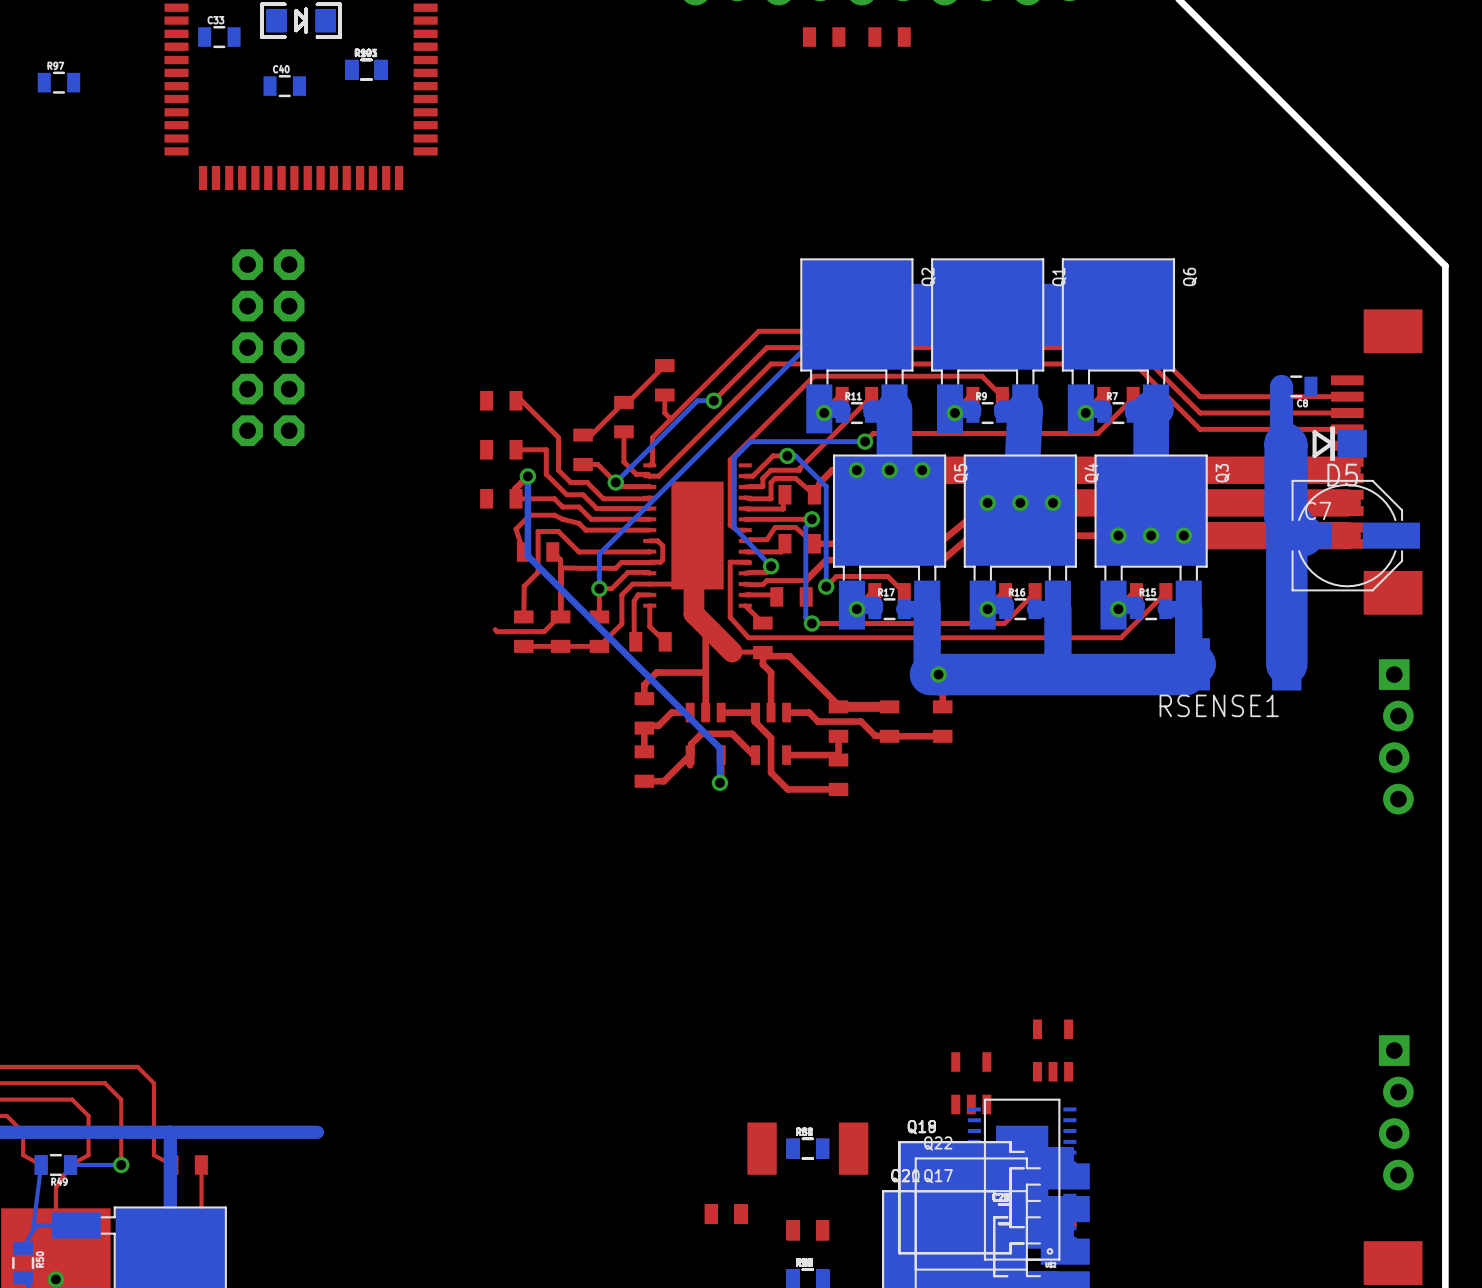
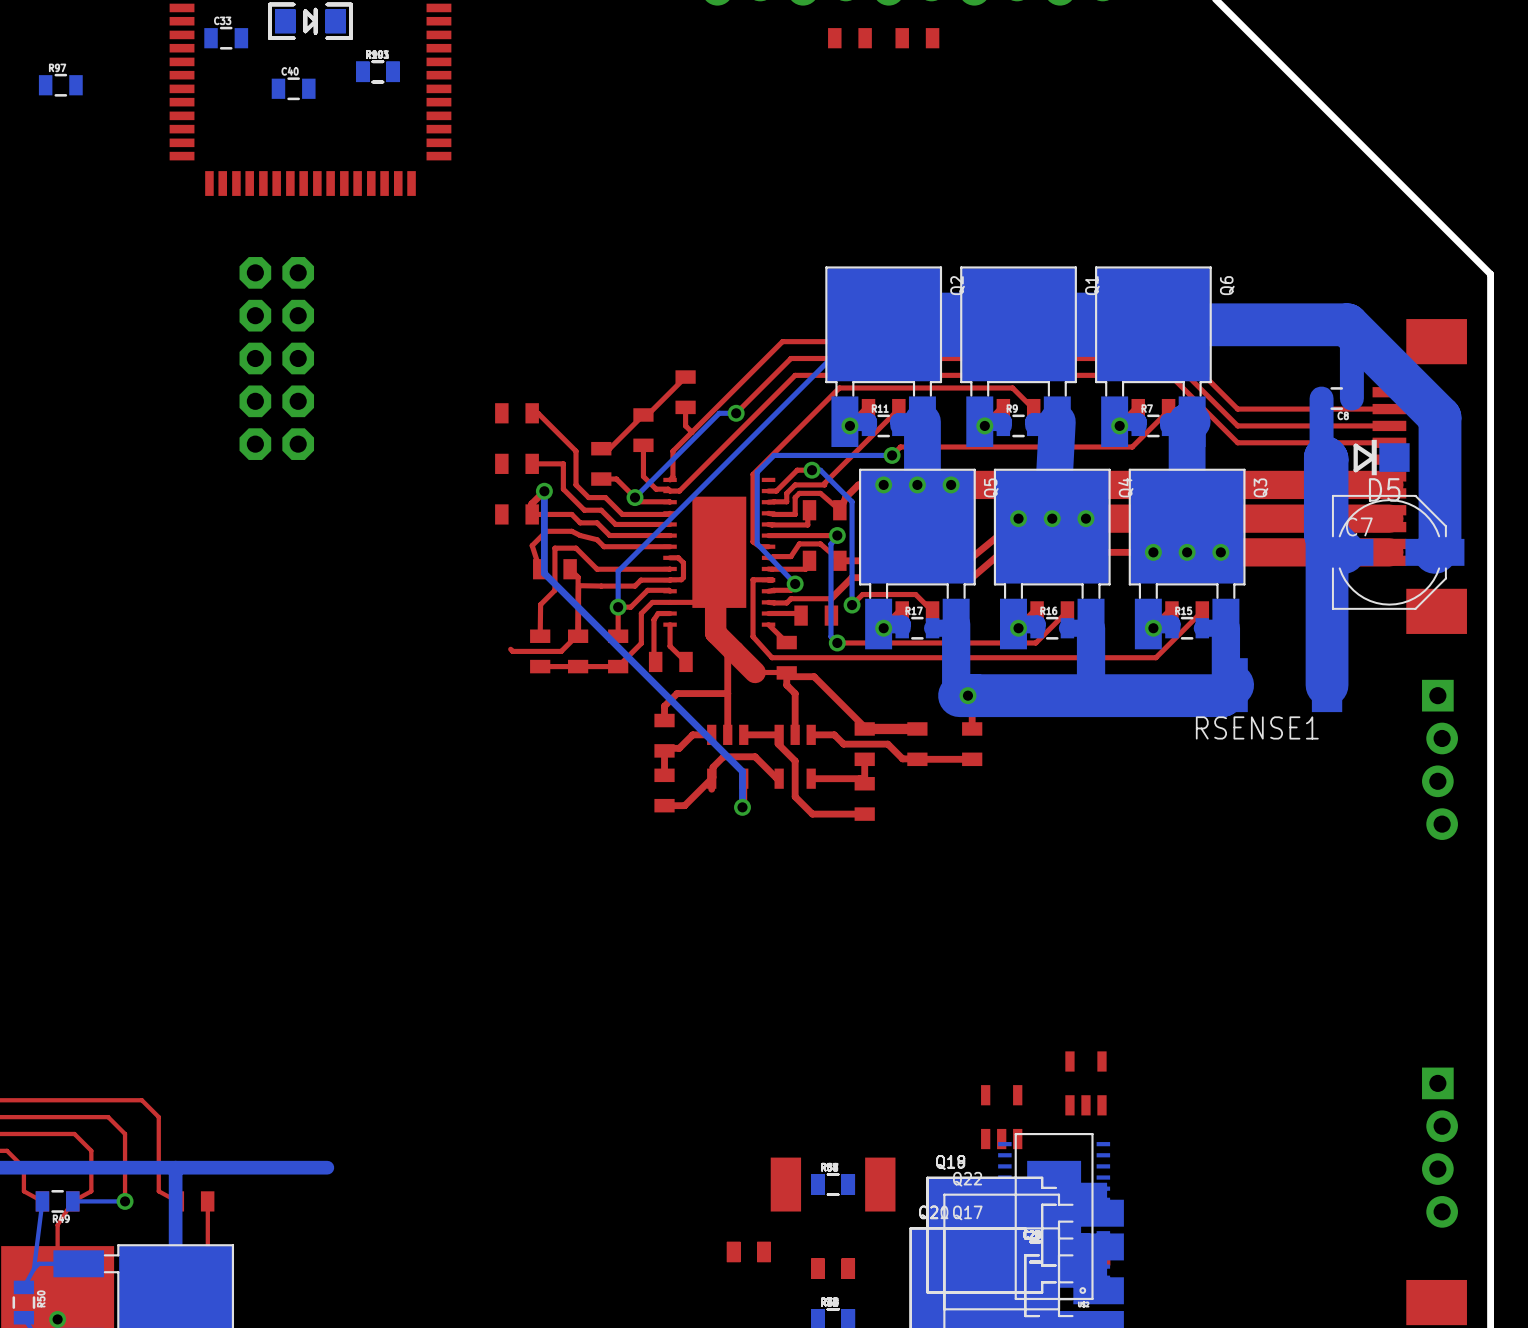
bottom track: none -> (1347, 324) (1153, 324)
bottom track: none -> (1347, 324) (1440, 417) (1440, 547) (1434, 552)
bottom track: none -> (1347, 324) (1351, 329) (1351, 398)

